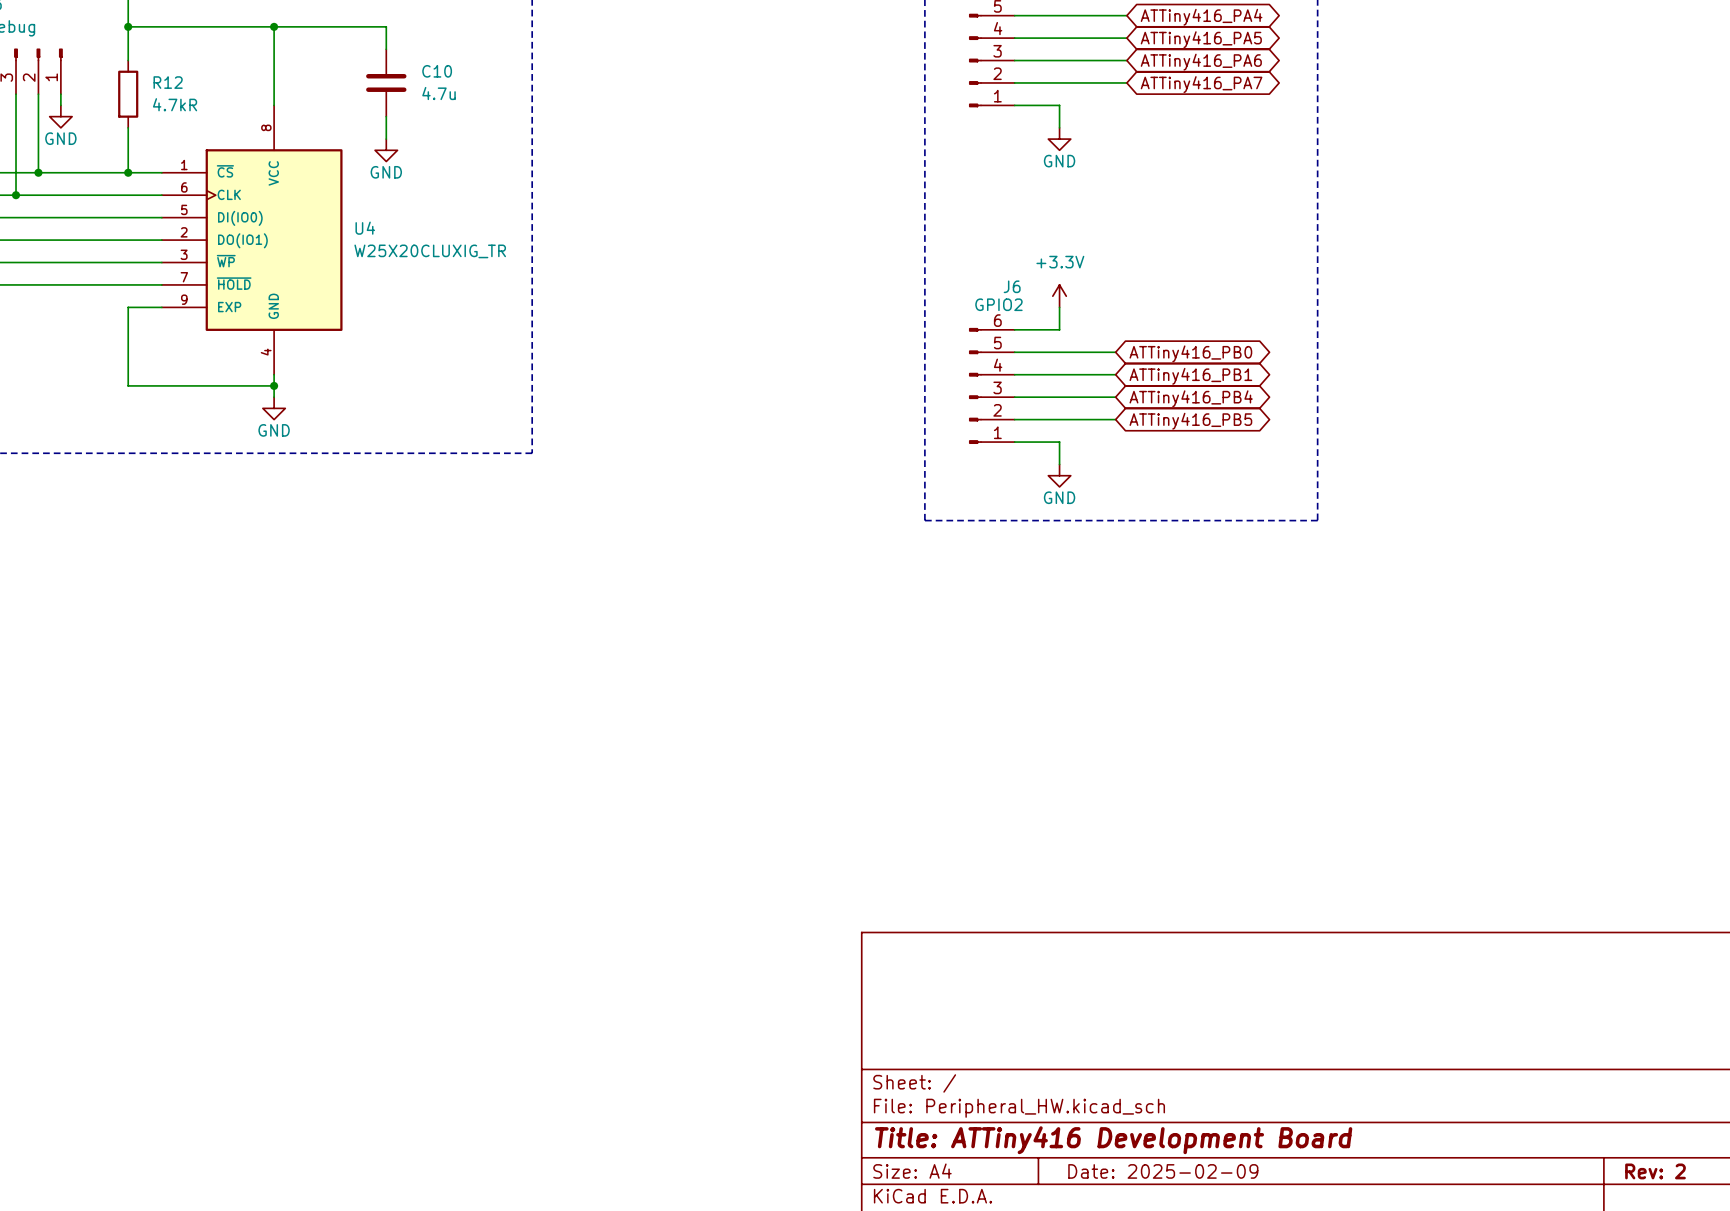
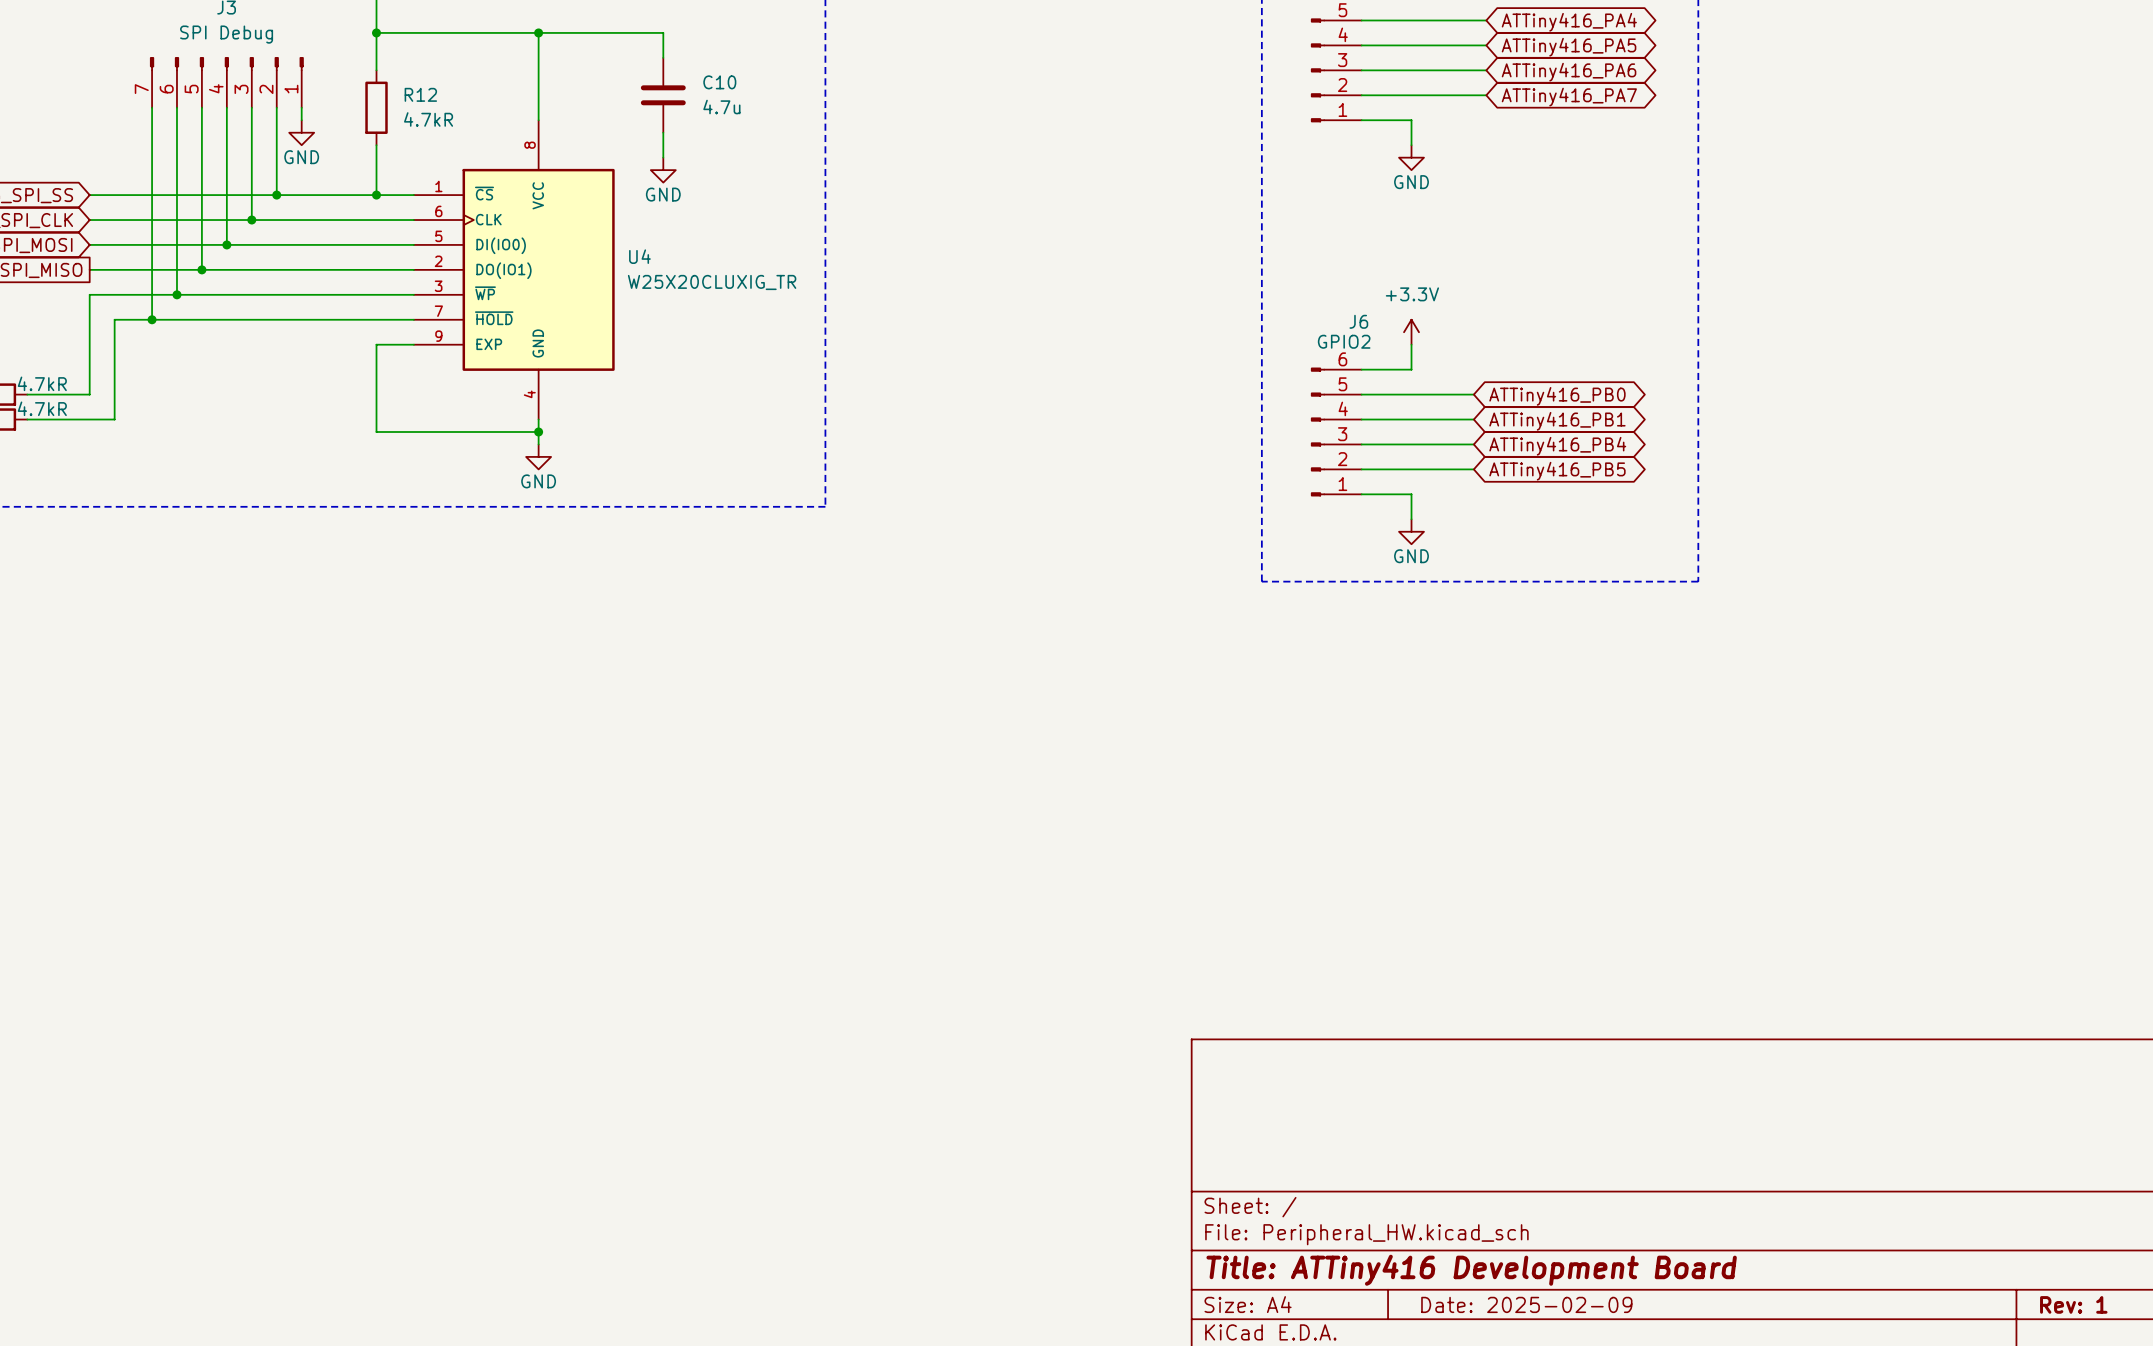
title block: Rev: 2 (1655, 1171) -> Rev: 1 (2073, 1304)

